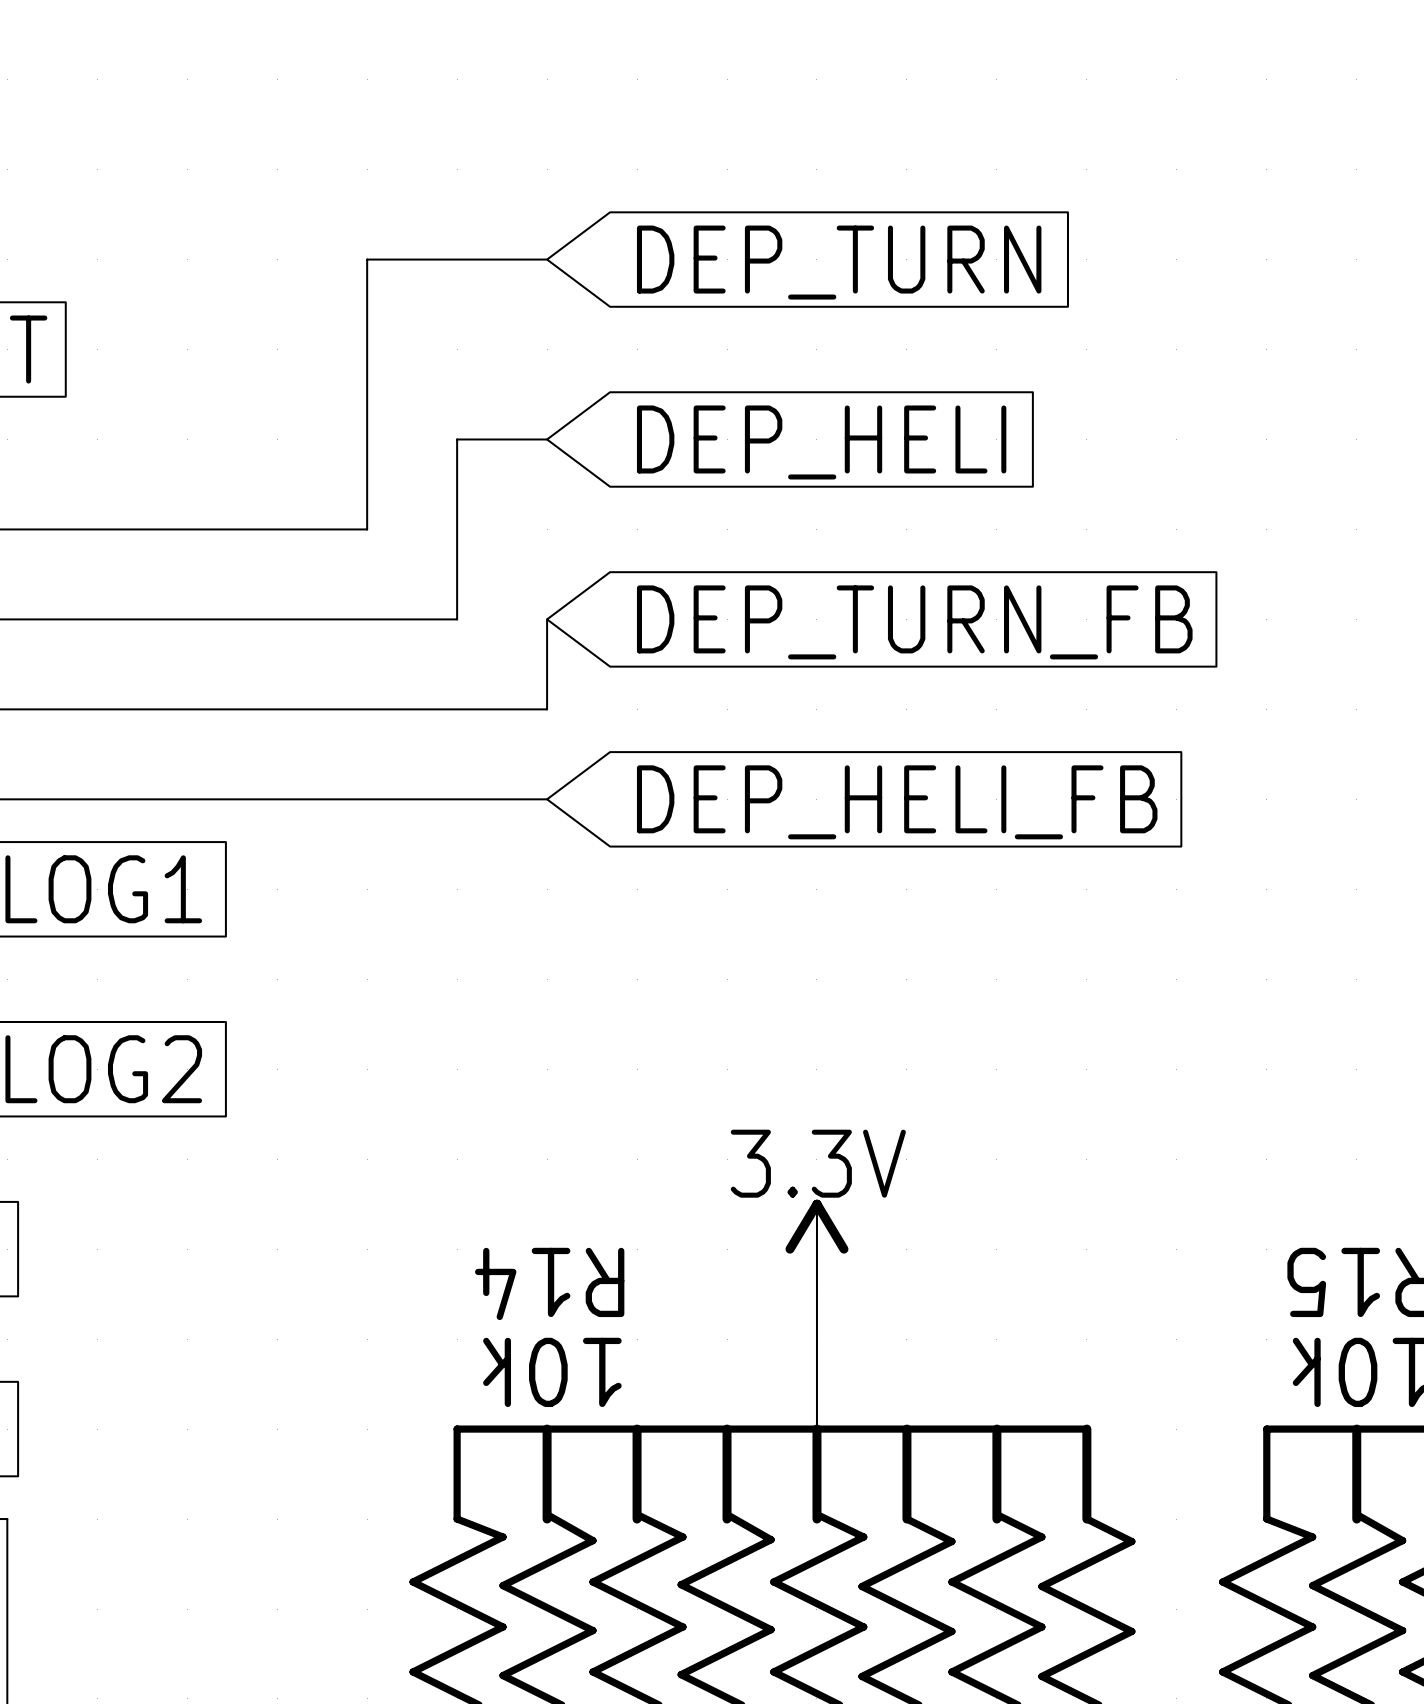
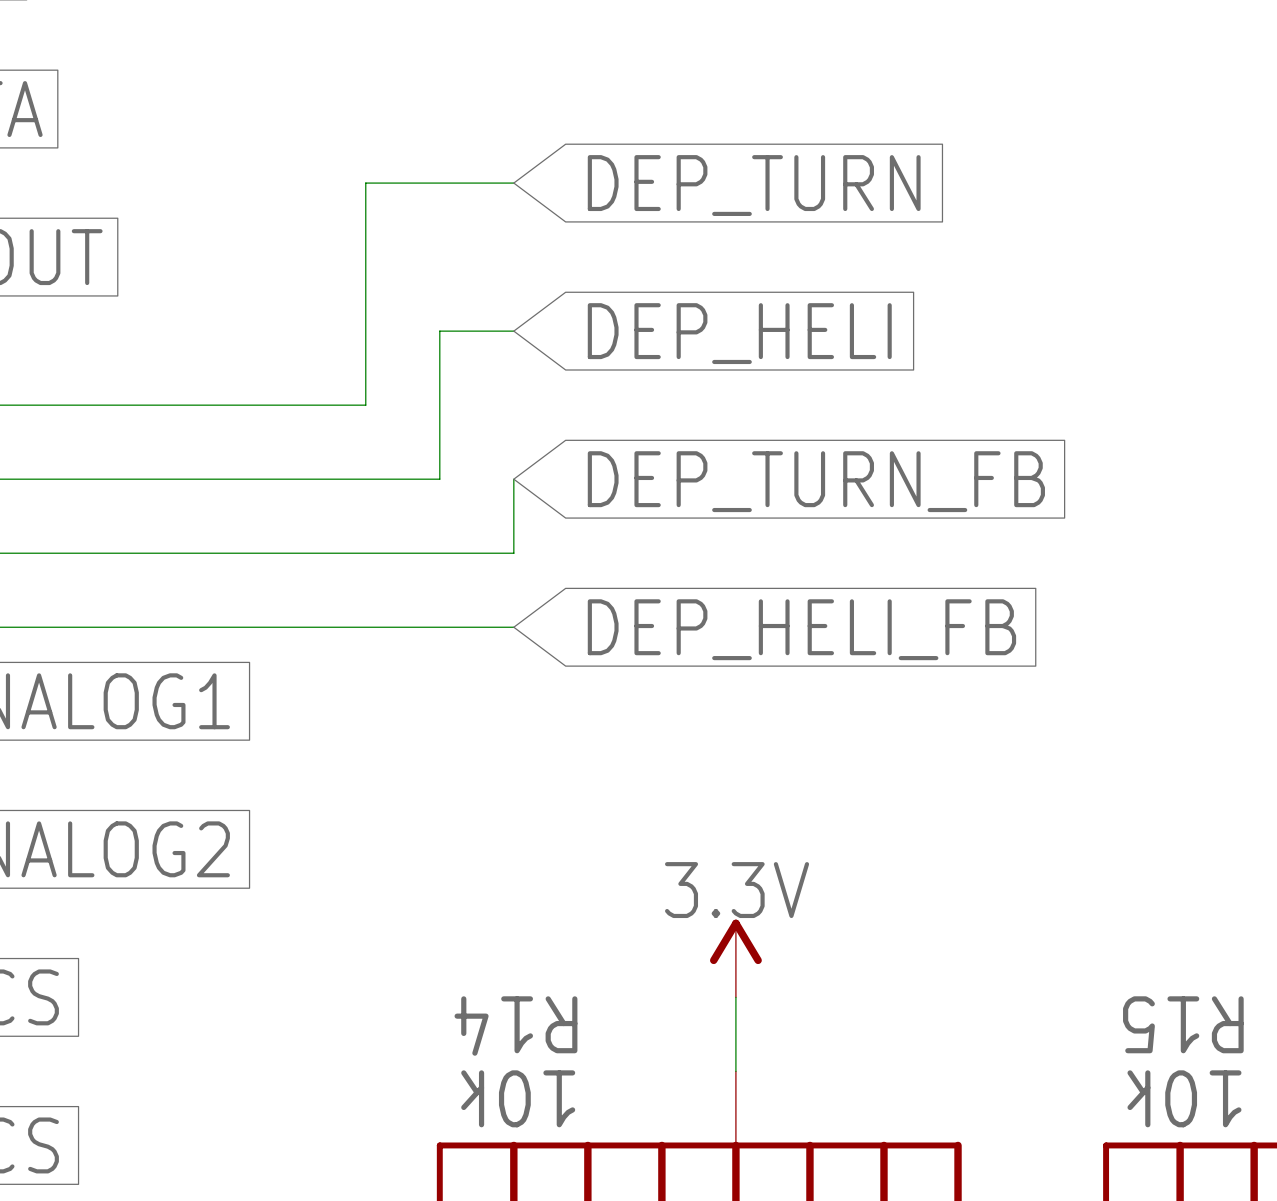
power symbol position: 3.3V (816, 1246) -> 3.3V (735, 958)

